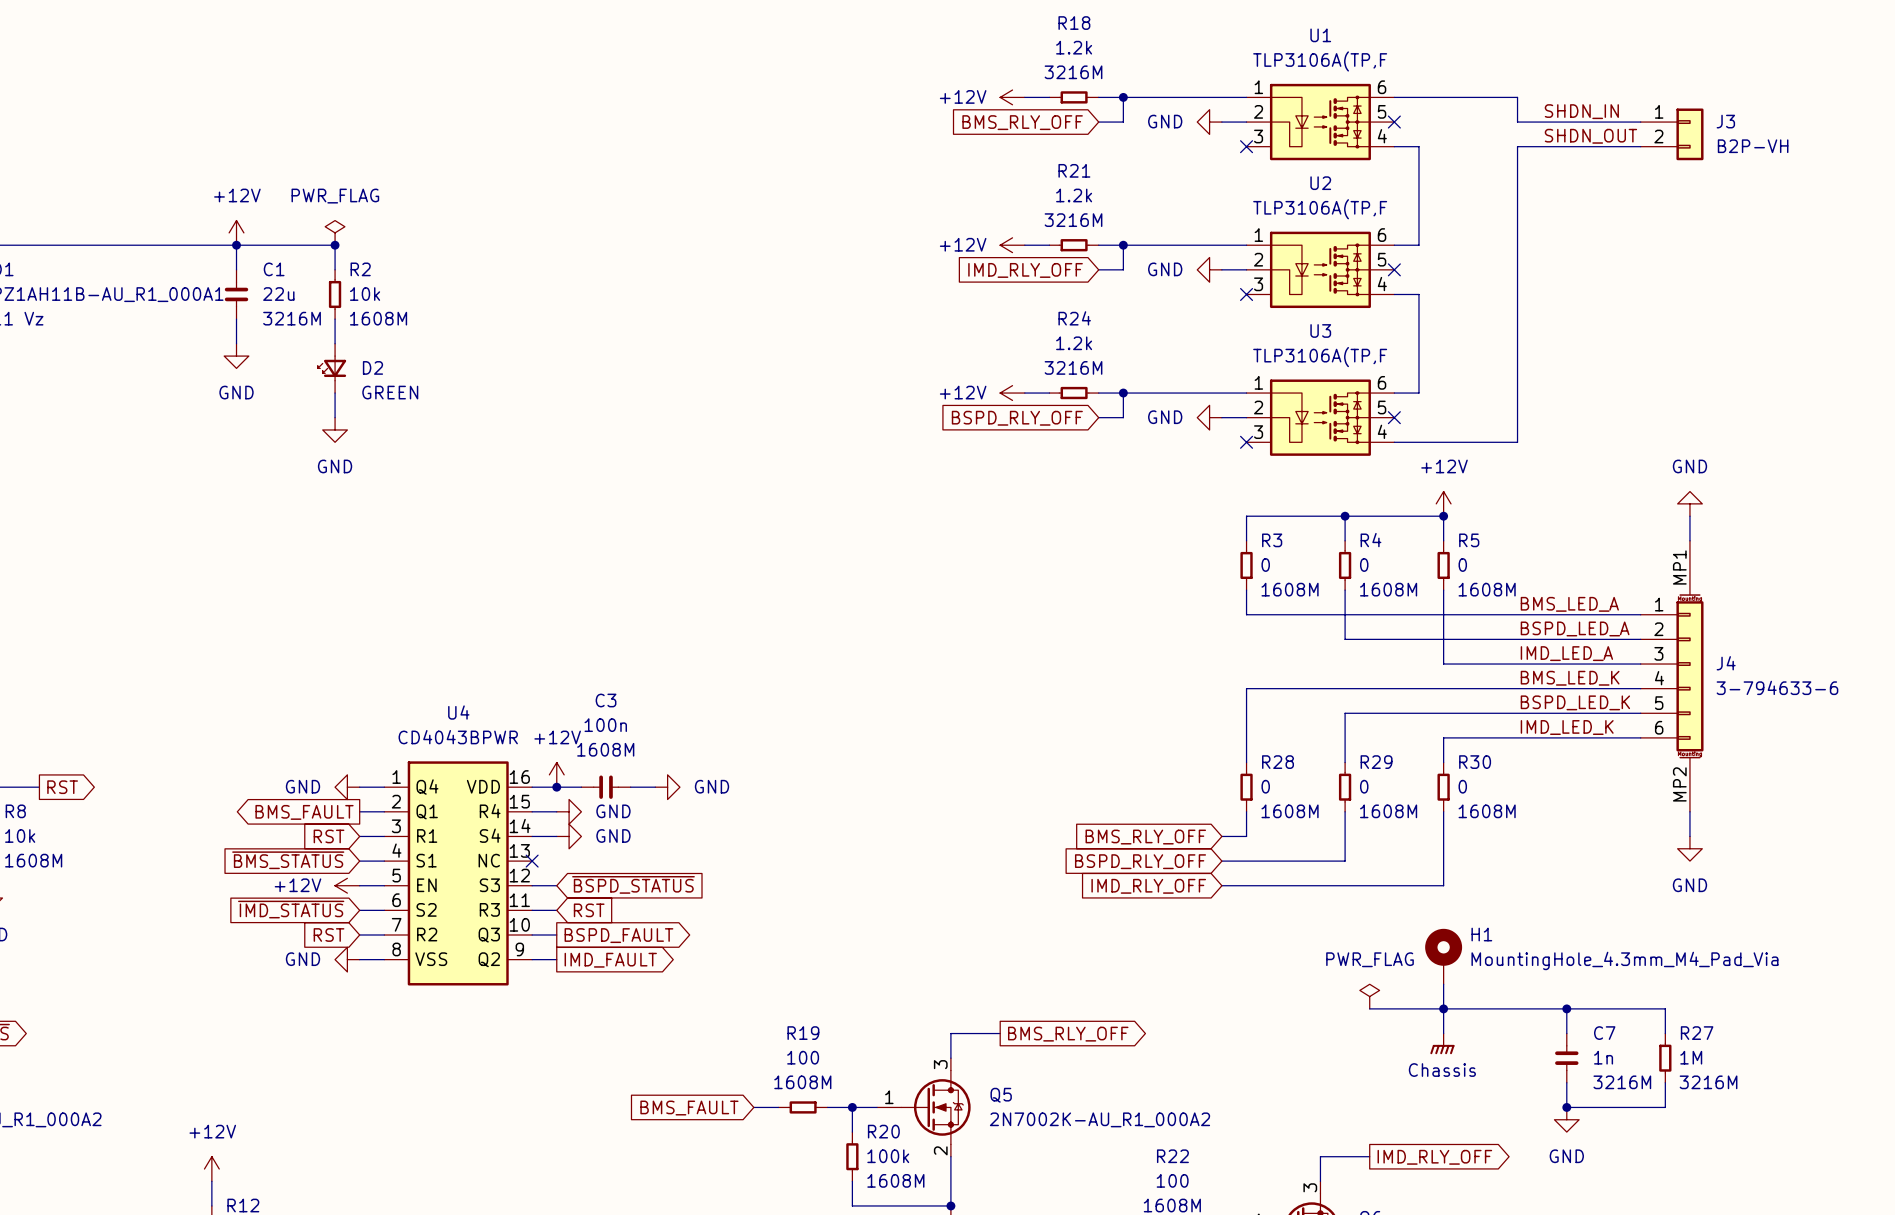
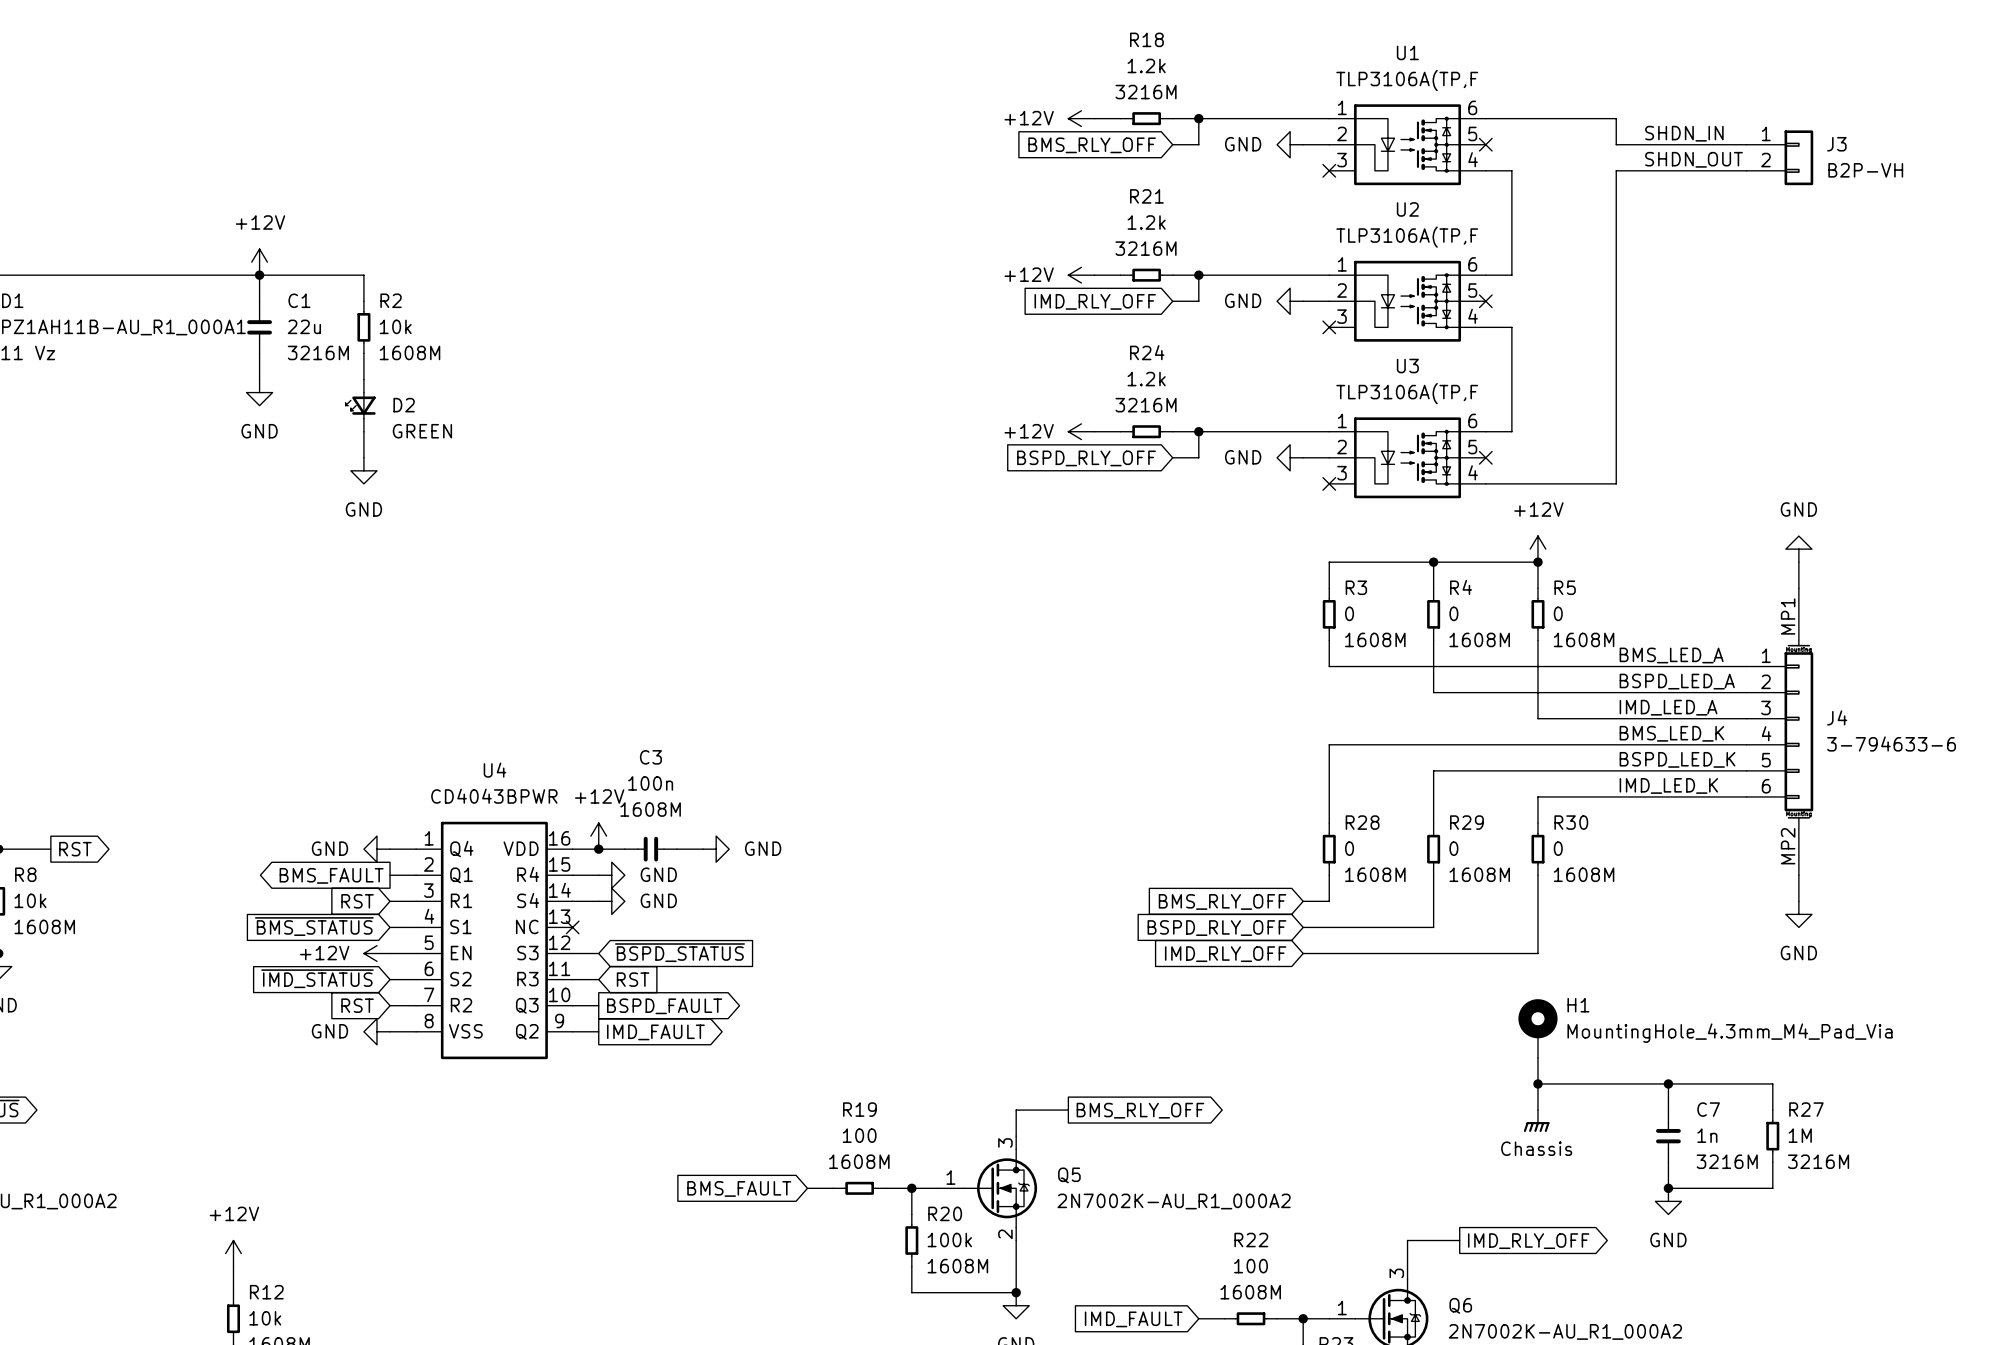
power symbol: PWR_FLAG (335, 232) -> none
junction: (335, 245) -> none
power symbol: PWR_FLAG (1369, 996) -> none
wire: (1369, 1008) (1443, 1008) -> none

